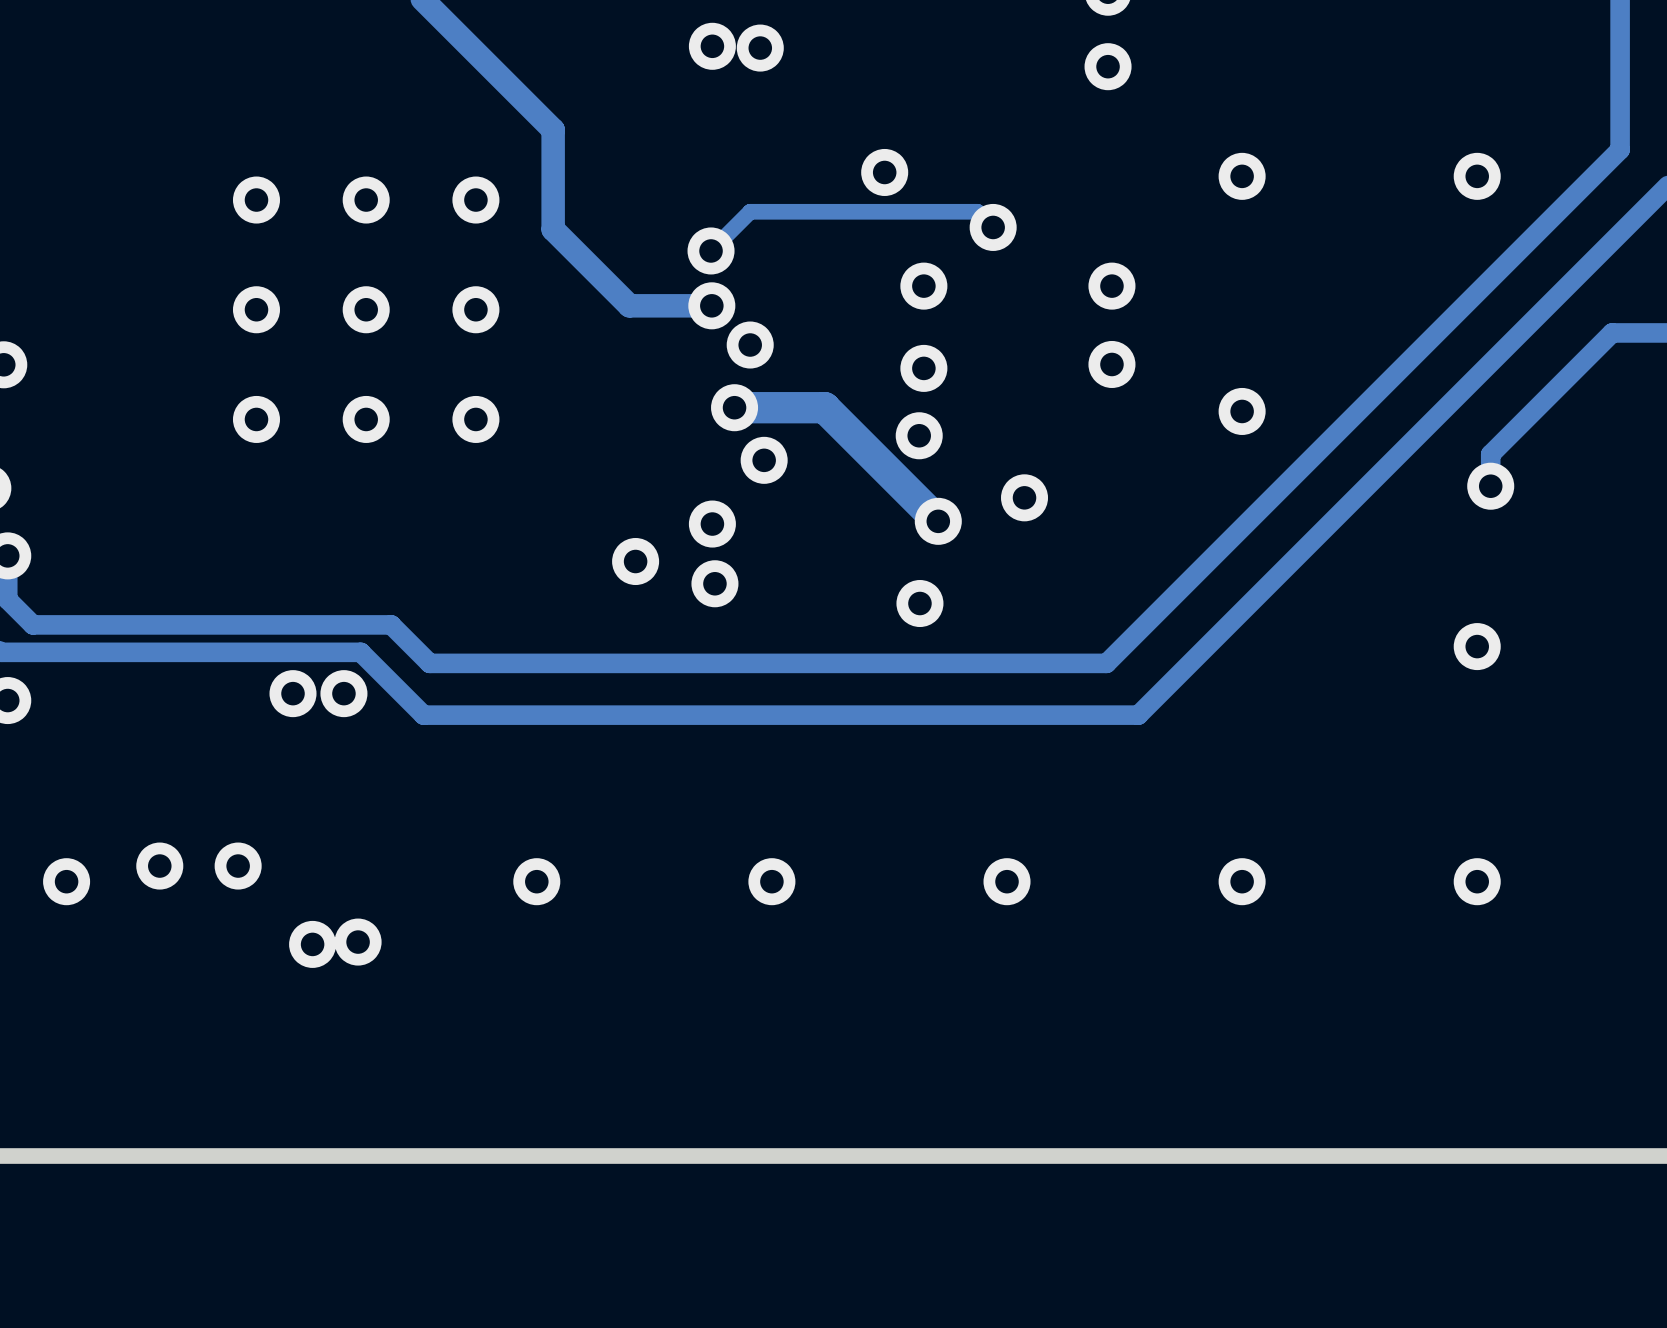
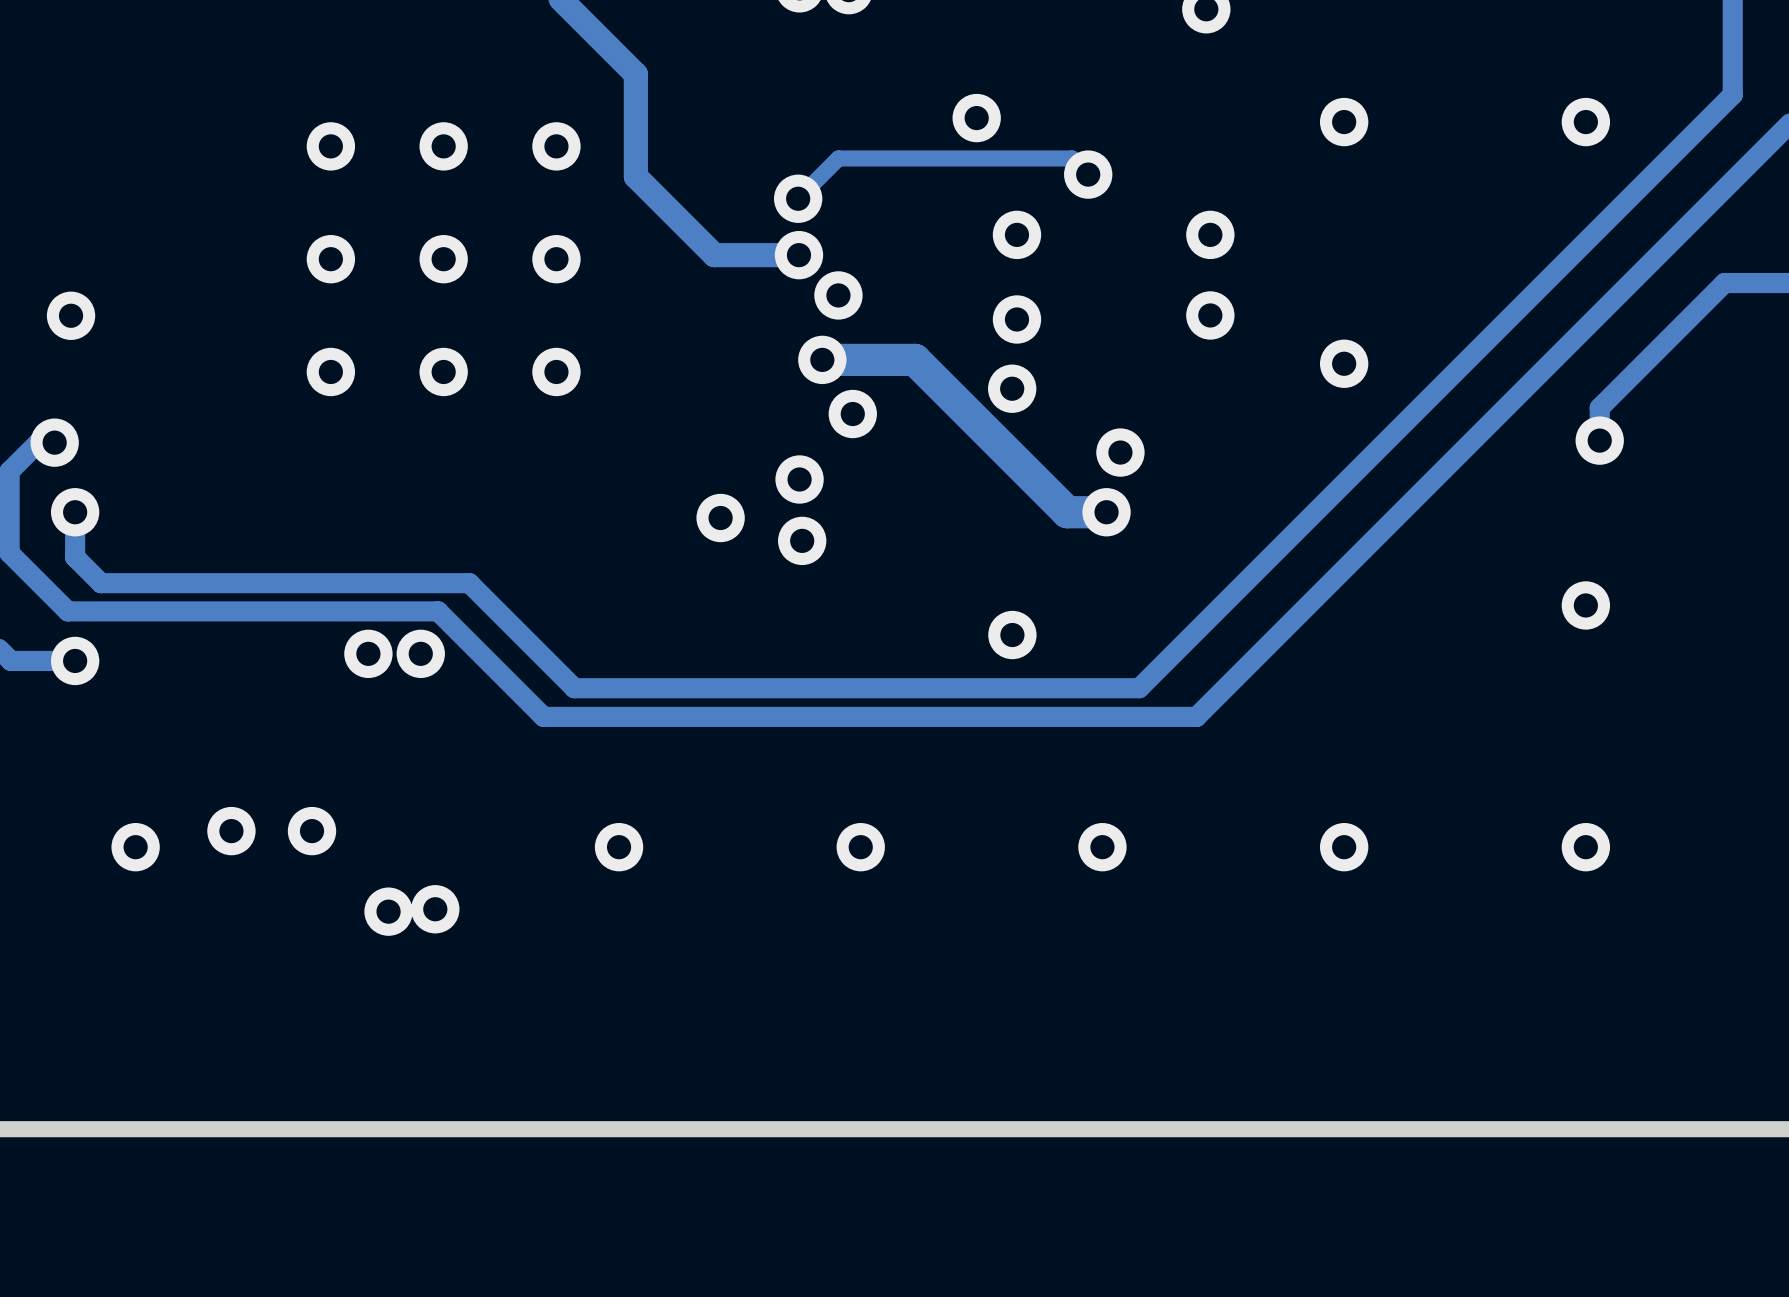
track: none -> (1031, 476) (1067, 512) (1106, 512)
via: (938, 521) -> none
via: none -> (1106, 512)
via: (919, 603) -> none
track: (1106, 663) (429, 663) -> (1204, 622) (1139, 688) (574, 688) (508, 622)
via: none -> (1012, 635)
track: (1138, 715) (423, 715) -> (1237, 675) (1196, 716) (543, 716) (502, 675)

